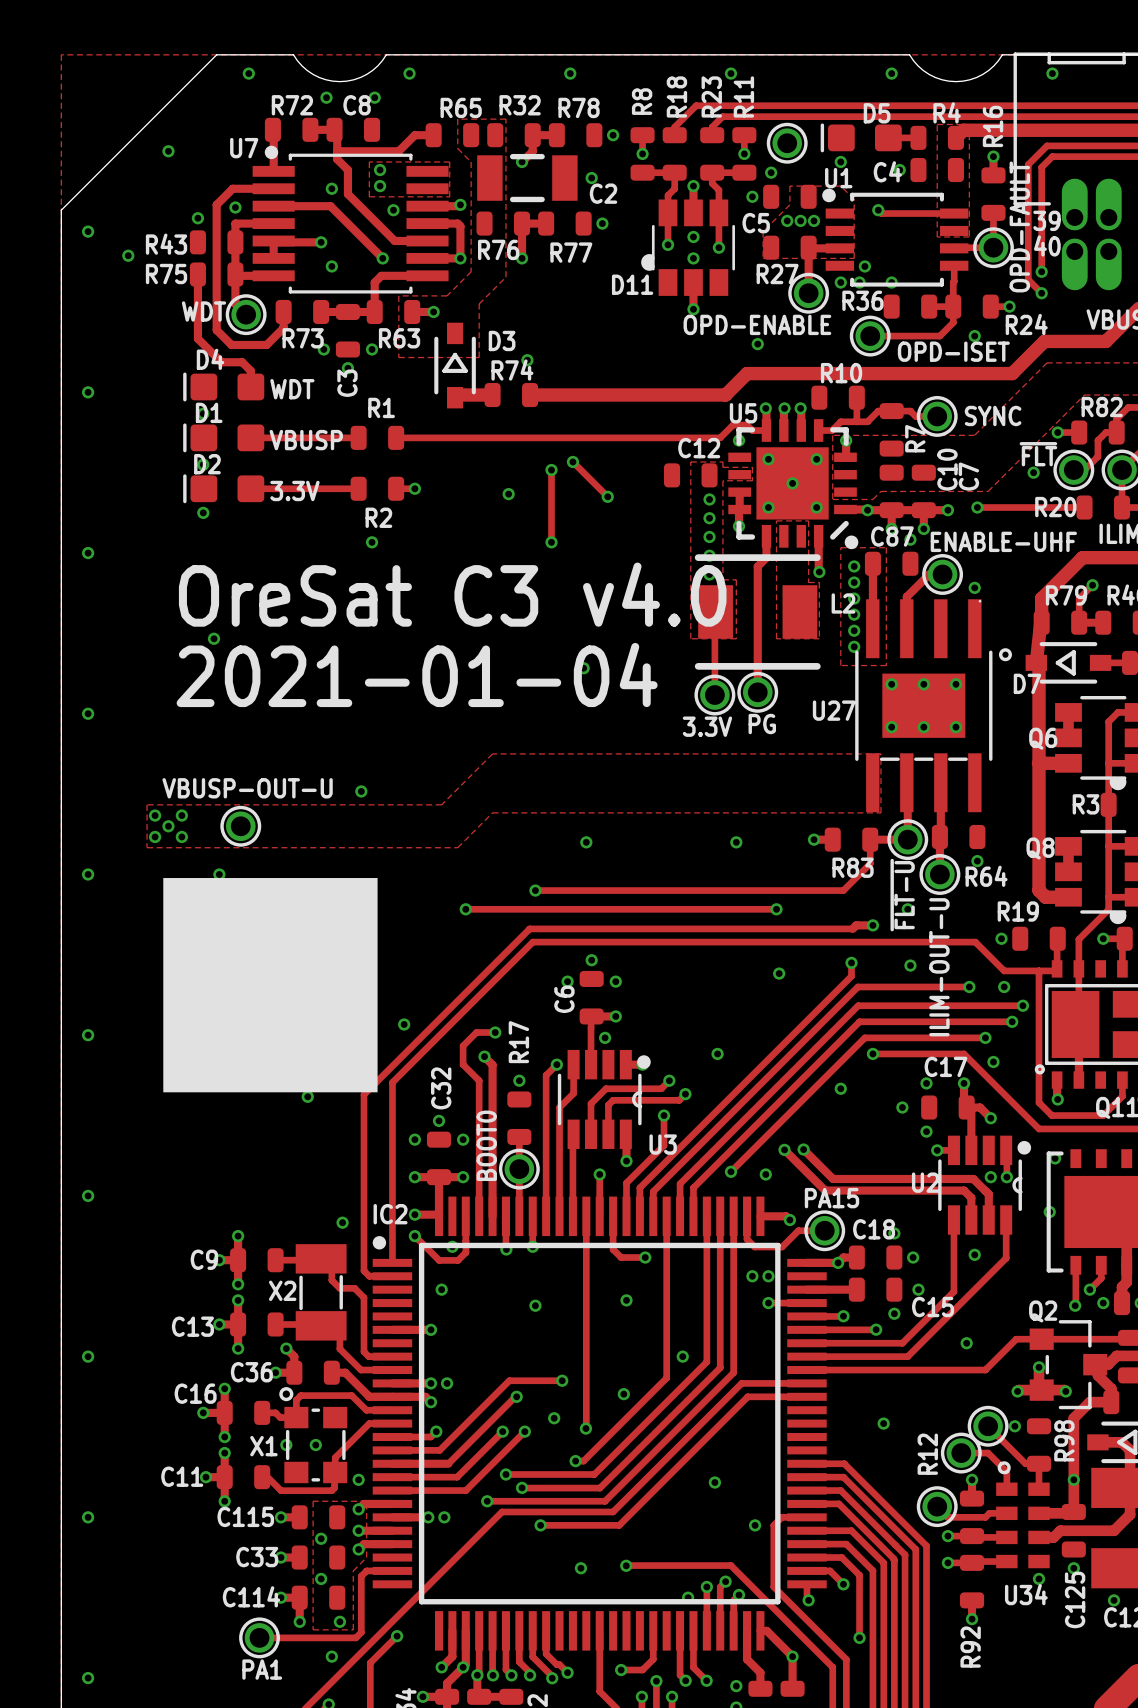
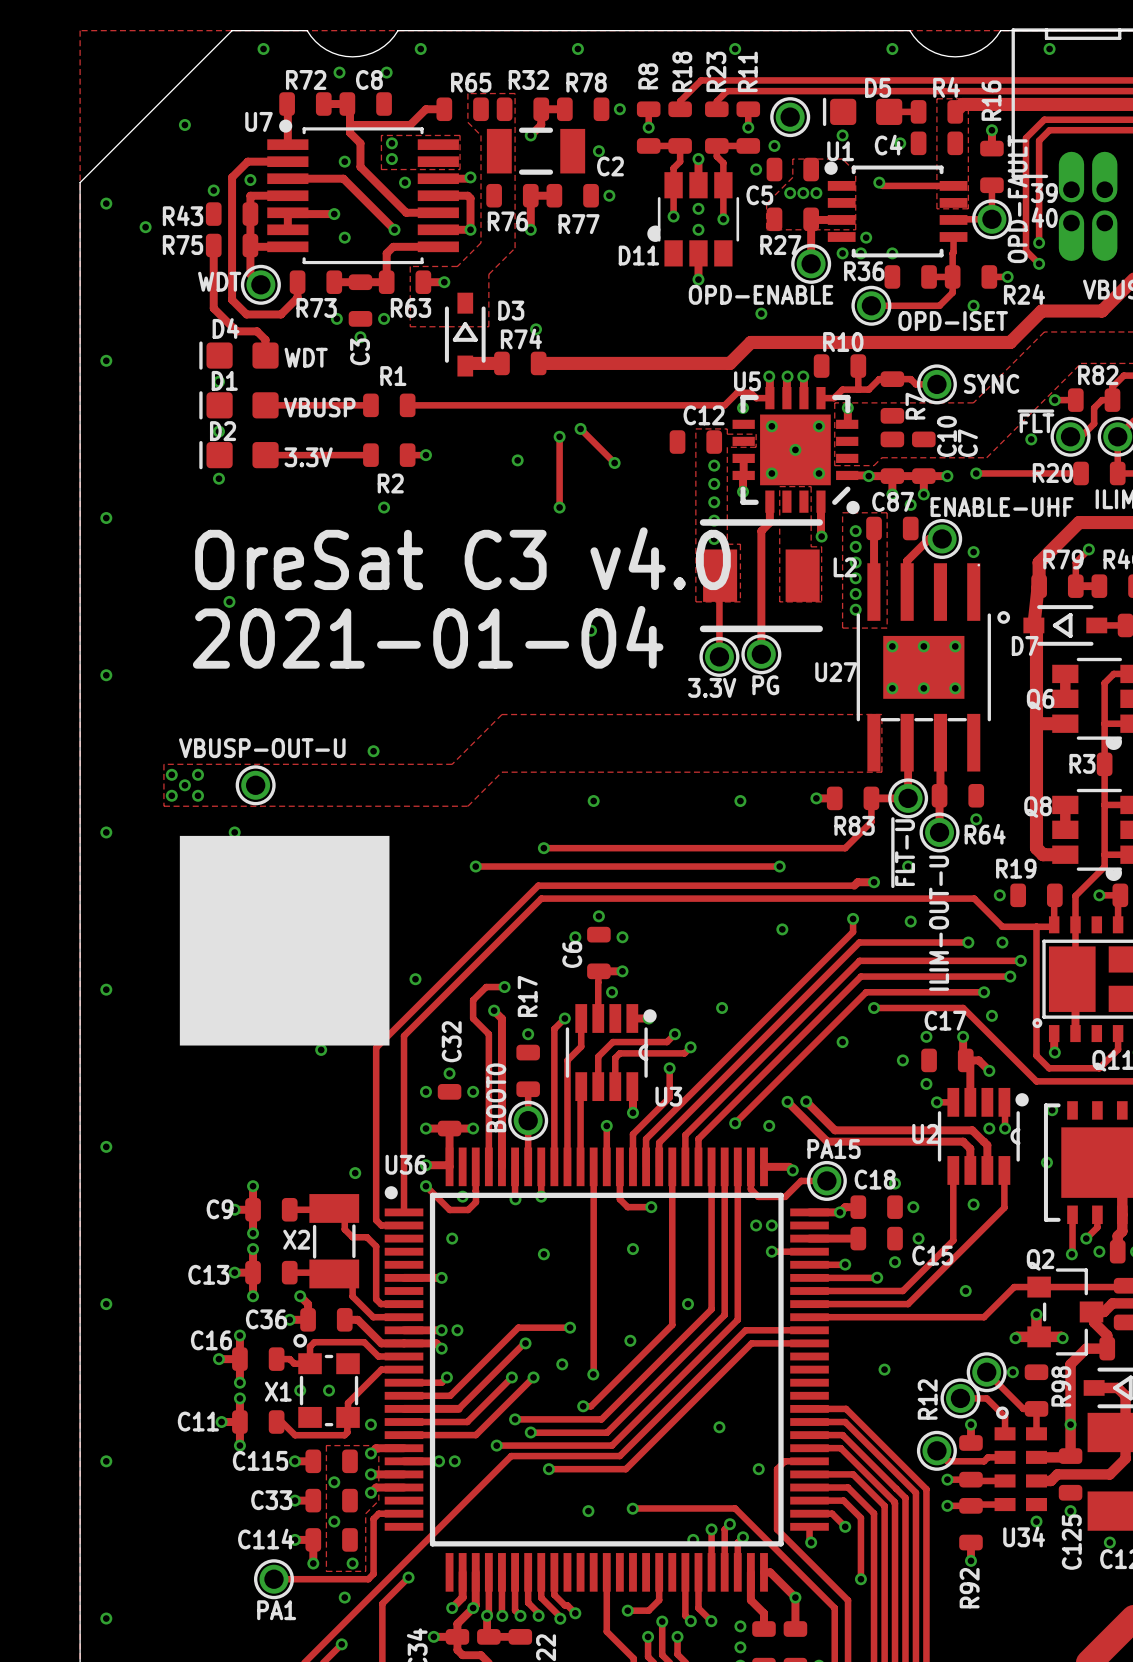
IC2 name: IC2 (390, 1214) -> U36 (406, 1164)

